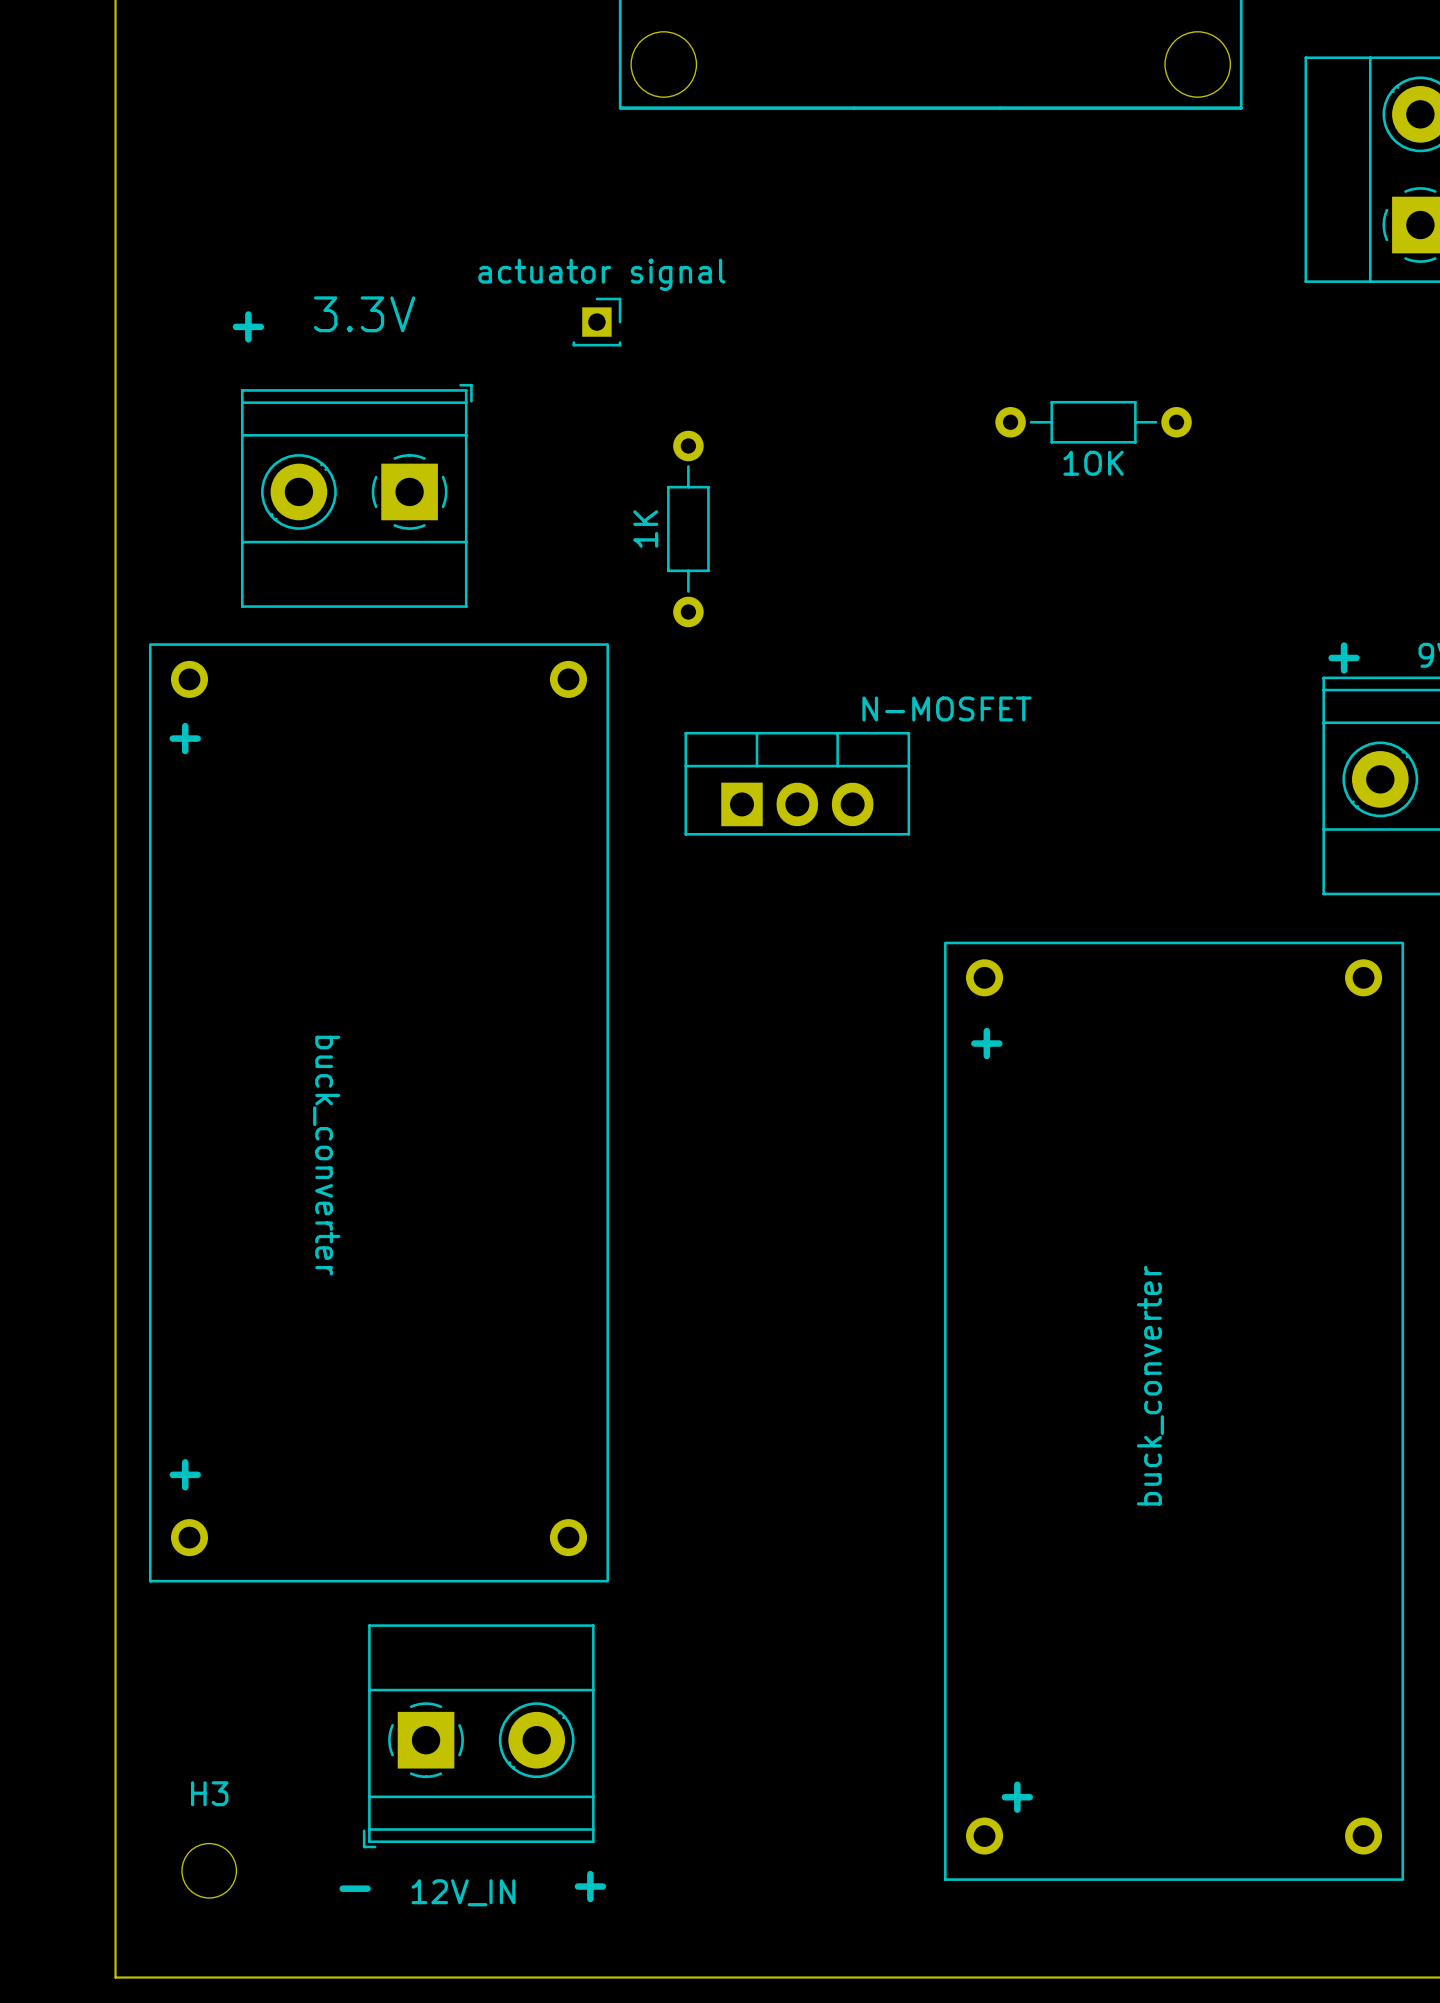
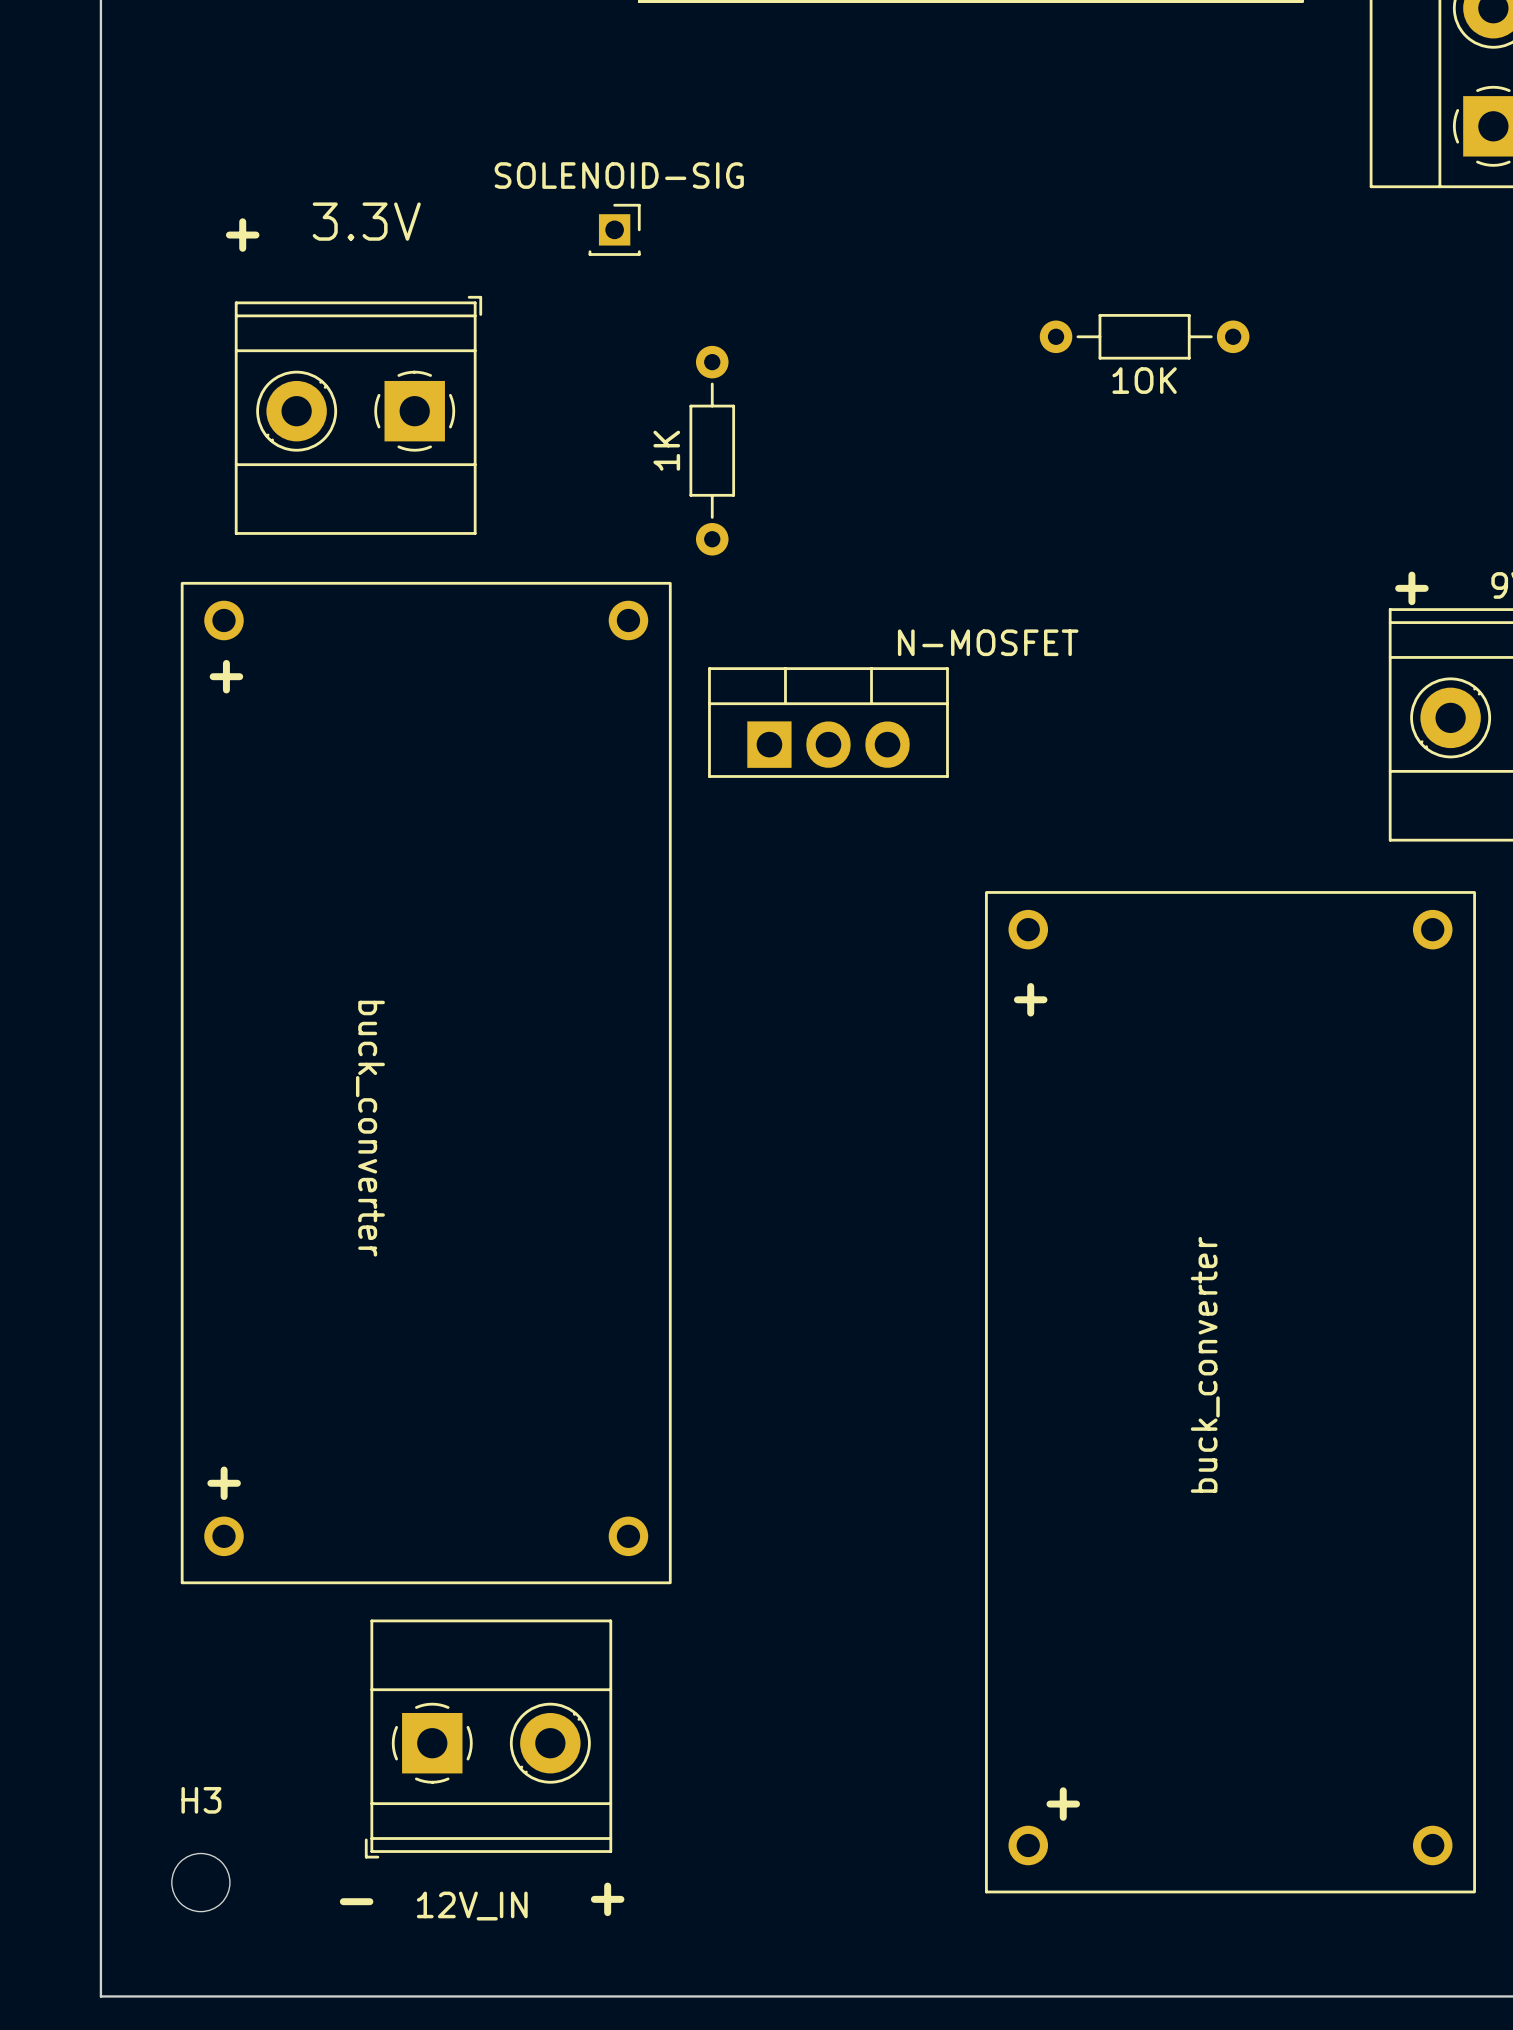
actuator signal name: actuator signal (601, 274) -> SOLENOID-SIG (619, 175)
text position: + (185, 738) -> + (226, 676)
part position: (378, 1112) -> (426, 1083)
text position: + (185, 1474) -> + (224, 1483)

